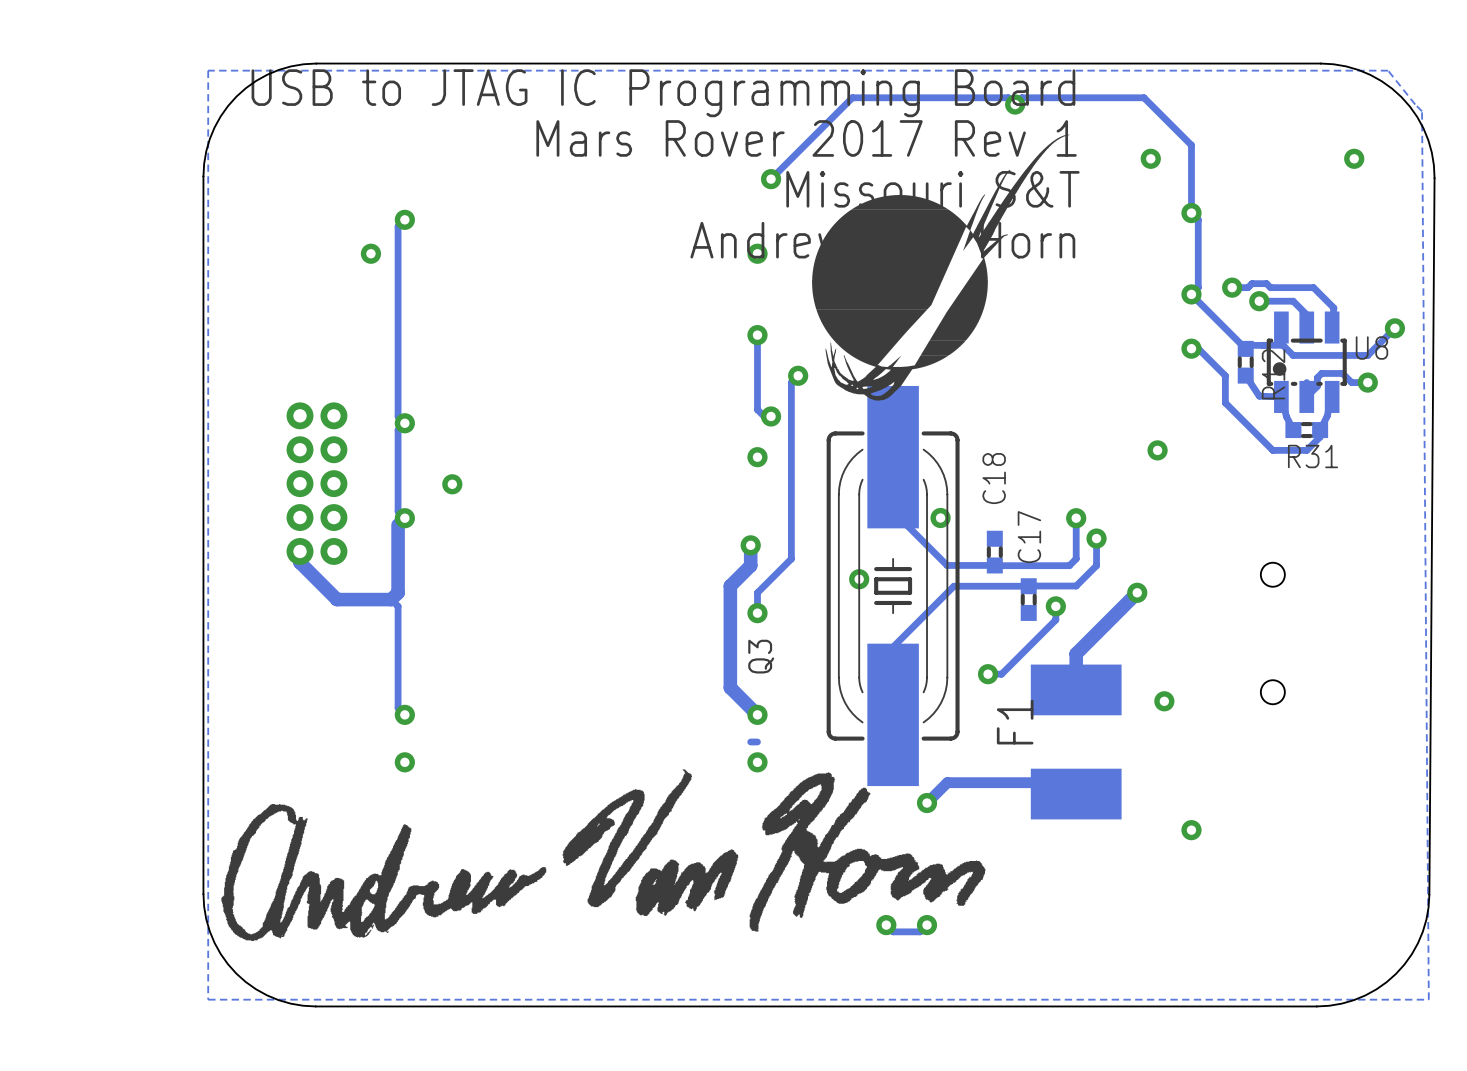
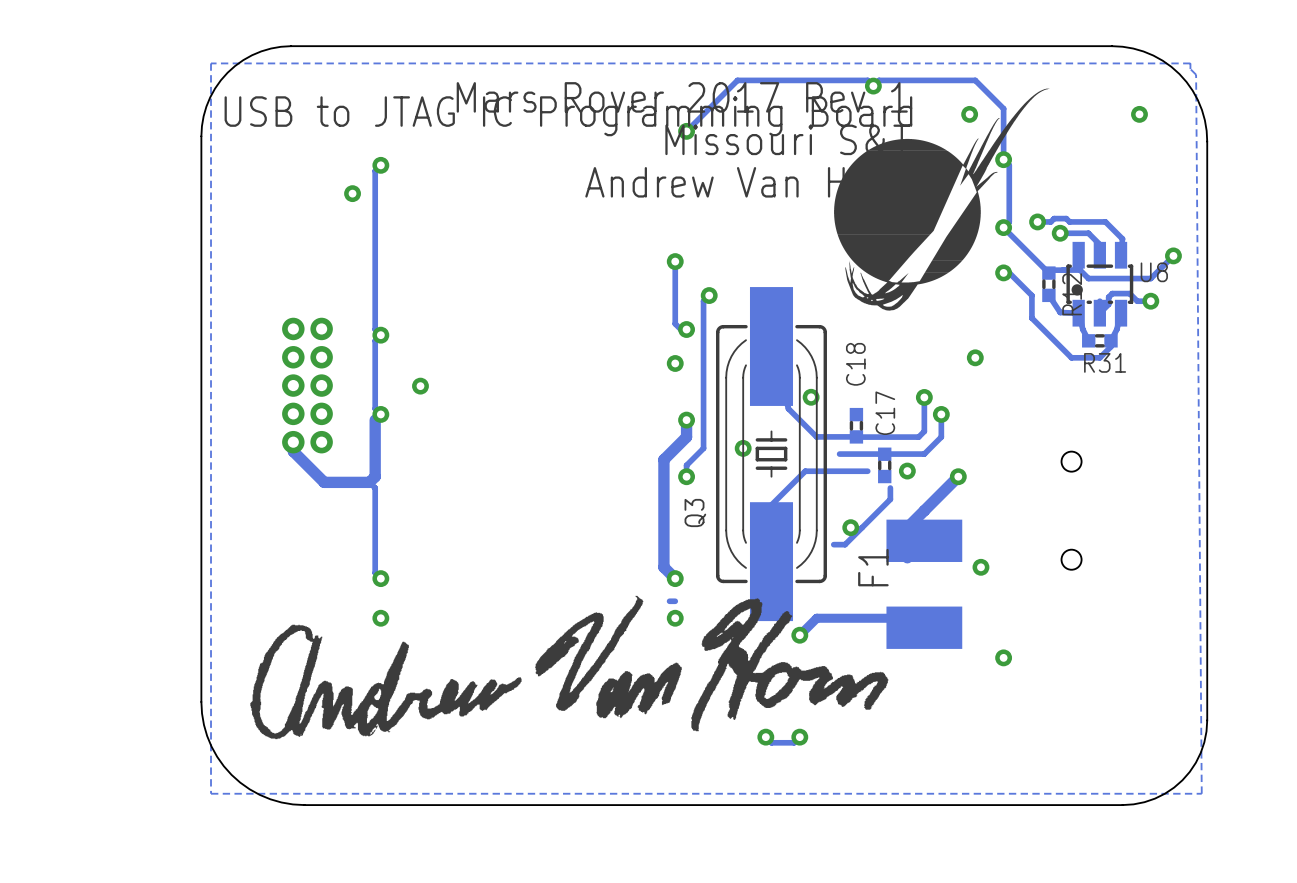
board edge: (1320, 63) (316, 63) (279, 69) (245, 88) (228, 106) (214, 127) (206, 151) (203, 176) (203, 894) (209, 931) (227, 964) (245, 981) (267, 995) (290, 1003) (315, 1006) (1316, 1006) (1353, 1000) (1386, 982) (1404, 964) (1417, 943) (1426, 919) (1429, 894) (1433, 165) (1428, 140) (1417, 117) (1392, 88) (1358, 69) (1320, 63) -> (1112, 46) (1143, 51) (1171, 66) (1186, 82) (1197, 100) (1206, 130) (1207, 720) (1204, 742) (1195, 762) (1174, 787) (1154, 798) (1122, 805) (304, 805) (281, 802) (259, 794) (240, 782) (223, 766) (207, 736) (201, 701) (201, 136) (203, 116) (210, 97) (220, 80) (235, 66) (261, 51) (291, 46) (1112, 46)
text position: USB to JTAG IC Programming Board (663, 93) -> USB to JTAG IC Programming Board (568, 116)
via position: (1015, 104) -> (873, 86)
zone outline: (1415, 104) (1388, 70) (208, 70) (208, 999) (1428, 999) (1422, 111) -> (1190, 69) (1190, 63) (211, 63) (211, 793) (1201, 793) (1196, 74)
track: (1191, 152) (1191, 145) (1144, 97) (1021, 97) (1015, 104) (1008, 97) (852, 97) (771, 179) -> (1003, 108) (975, 80) (879, 80) (873, 86) (867, 80) (737, 80) (686, 131)
via position: (771, 179) -> (686, 131)
track: (404, 219) (398, 226) (398, 416) (404, 423) (398, 430) (398, 511) (404, 518) (398, 524) (398, 592) (391, 599) (398, 606) (398, 708) (404, 714) -> none
via: (404, 219) -> none
track: none -> (380, 165) (375, 170) (375, 329) (380, 335) (375, 340) (375, 408) (380, 414) (375, 420) (375, 476) (369, 482)
via: none -> (380, 165)
via: (370, 253) -> none
via: none -> (352, 193)
via: (757, 253) -> none
drawing position: (941, 267) -> (941, 199)
track: (757, 335) (757, 409) (764, 416) (771, 416) -> (675, 261) (675, 323) (680, 329) (686, 329)
via: (757, 335) -> none
via: none -> (675, 261)
track: (798, 375) (791, 382) (791, 558) (757, 592) (757, 613) -> none
via: (798, 375) -> none
track: none -> (709, 295) (703, 301) (703, 448) (686, 465) (686, 476)
via: none -> (709, 295)
via: (771, 416) -> none
via: none -> (686, 329)
via: (404, 423) -> none
via: none -> (380, 335)
track: none -> (771, 346) (788, 408) (816, 436) (856, 436)
via: (757, 457) -> none
via: none -> (675, 363)
track: (893, 457) (906, 524) (947, 565) (994, 565) -> none
part position: (316, 483) -> (307, 385)
via: (452, 484) -> none
via: none -> (420, 386)
track: none -> (924, 397) (924, 431) (918, 437) (856, 437)
via: none -> (924, 397)
via position: (940, 517) -> (811, 397)
via: (404, 518) -> none
via: none -> (380, 414)
track: (1076, 518) (1076, 558) (1069, 565) -> (941, 414) (941, 437) (924, 454) (901, 454)
via: (1076, 518) -> none
via: none -> (941, 414)
track: none -> (686, 420) (686, 437) (663, 459) (663, 567) (675, 578)
via: none -> (686, 420)
track: (1096, 538) (1096, 565) (1076, 586) (1028, 586) -> none
via: (1096, 538) -> none
track: (750, 545) (750, 565) (730, 586) (730, 687) (757, 714) -> none
via: (750, 545) -> none
track: (300, 551) (300, 562) (337, 599) (377, 599) -> (293, 442) (293, 451) (324, 482)
C18 position: (994, 552) -> (856, 425)
via: none -> (743, 448)
via: (859, 579) -> none
Q3 position: (893, 586) -> (771, 454)
via: none -> (907, 471)
via: none -> (686, 476)
track: none -> (369, 482) (375, 488) (375, 572) (380, 578)
track: none -> (369, 482) (335, 482)
C17 position: (1028, 599) -> (884, 465)
via: (1055, 606) -> none
via: (757, 613) -> none
Q3 name position: Q3 (761, 656) -> Q3 (695, 513)
via position: (988, 674) -> (850, 527)
via: (404, 714) -> none
via: none -> (380, 578)
via: (757, 714) -> none
via: none -> (675, 578)
track: (757, 741) (750, 741) -> (675, 601) (669, 601)
F1 position: (1076, 741) -> (924, 584)
via: (404, 762) -> none
via: none -> (380, 618)
via: (757, 762) -> none
via: none -> (675, 618)
track: (1076, 794) (1062, 782) (947, 782) (927, 803) -> (924, 627) (913, 618) (816, 618) (799, 635)
via position: (927, 803) -> (799, 635)
via position: (1191, 830) -> (1003, 657)
drawing position: (603, 855) -> (569, 667)
via: none -> (765, 737)
via: none -> (799, 737)
via: (886, 925) -> none
track: (927, 925) (920, 931) (893, 931) (886, 925) -> (799, 737) (794, 742) (771, 742) (765, 737)
via: (927, 925) -> none

